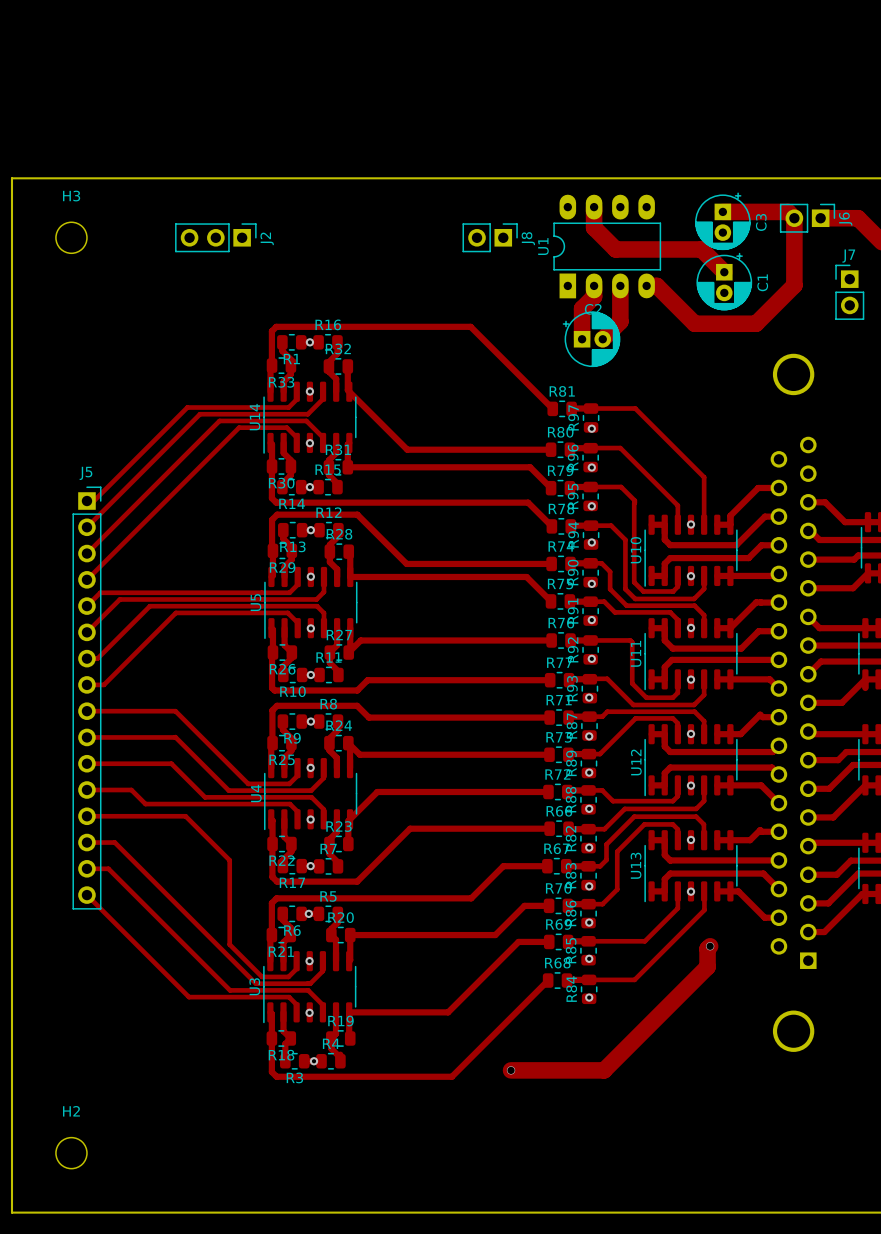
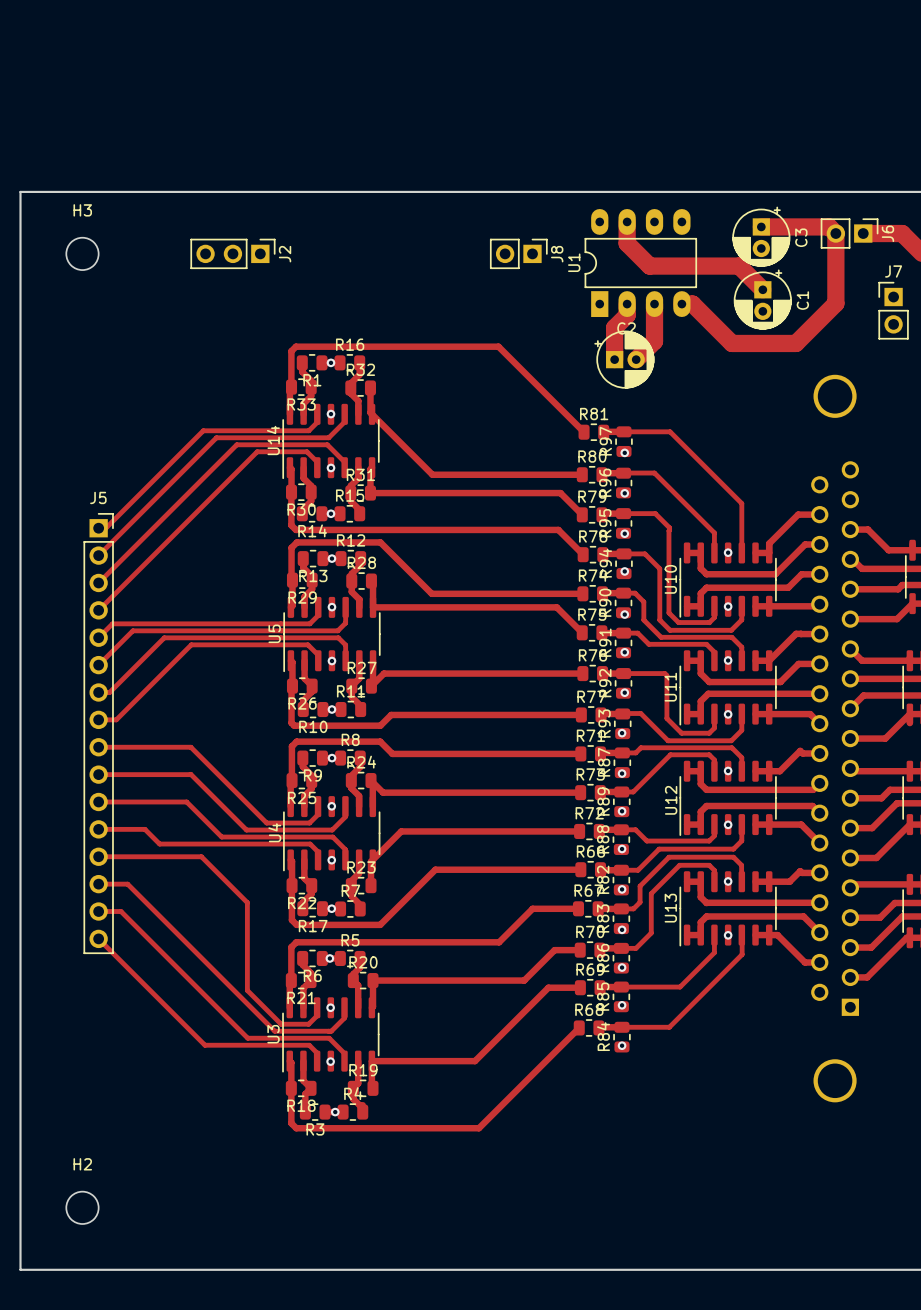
track: (710, 946) (707, 948) (707, 966) (604, 1070) (511, 1070) -> none
via: (710, 946) -> none
via: (511, 1070) -> none

